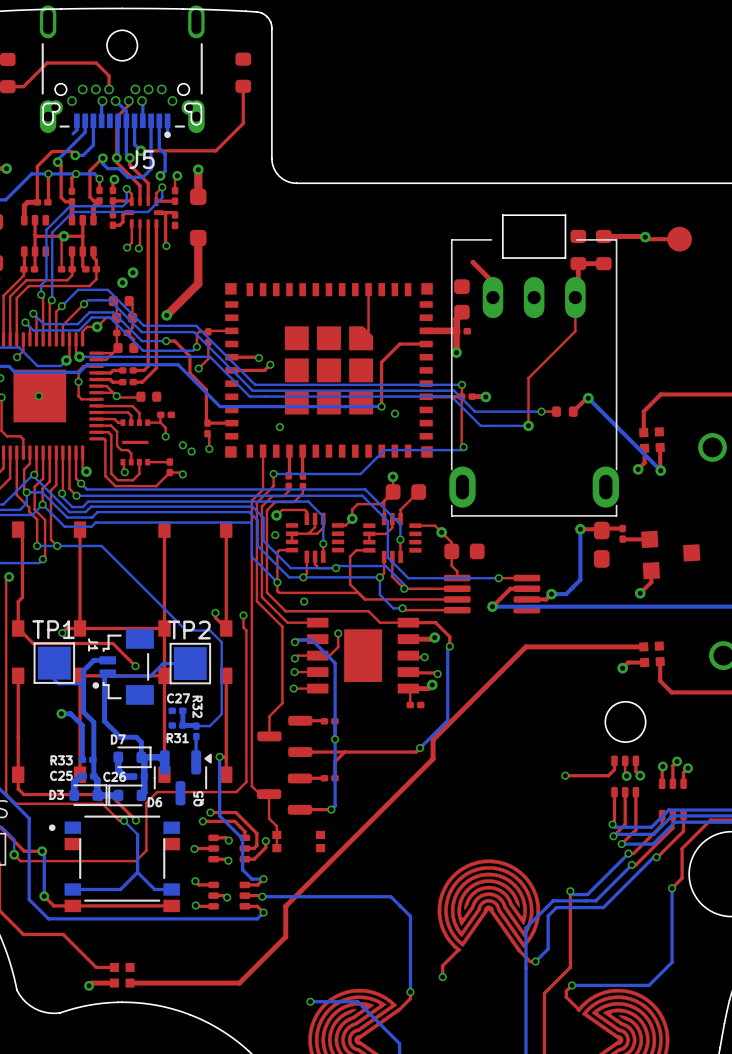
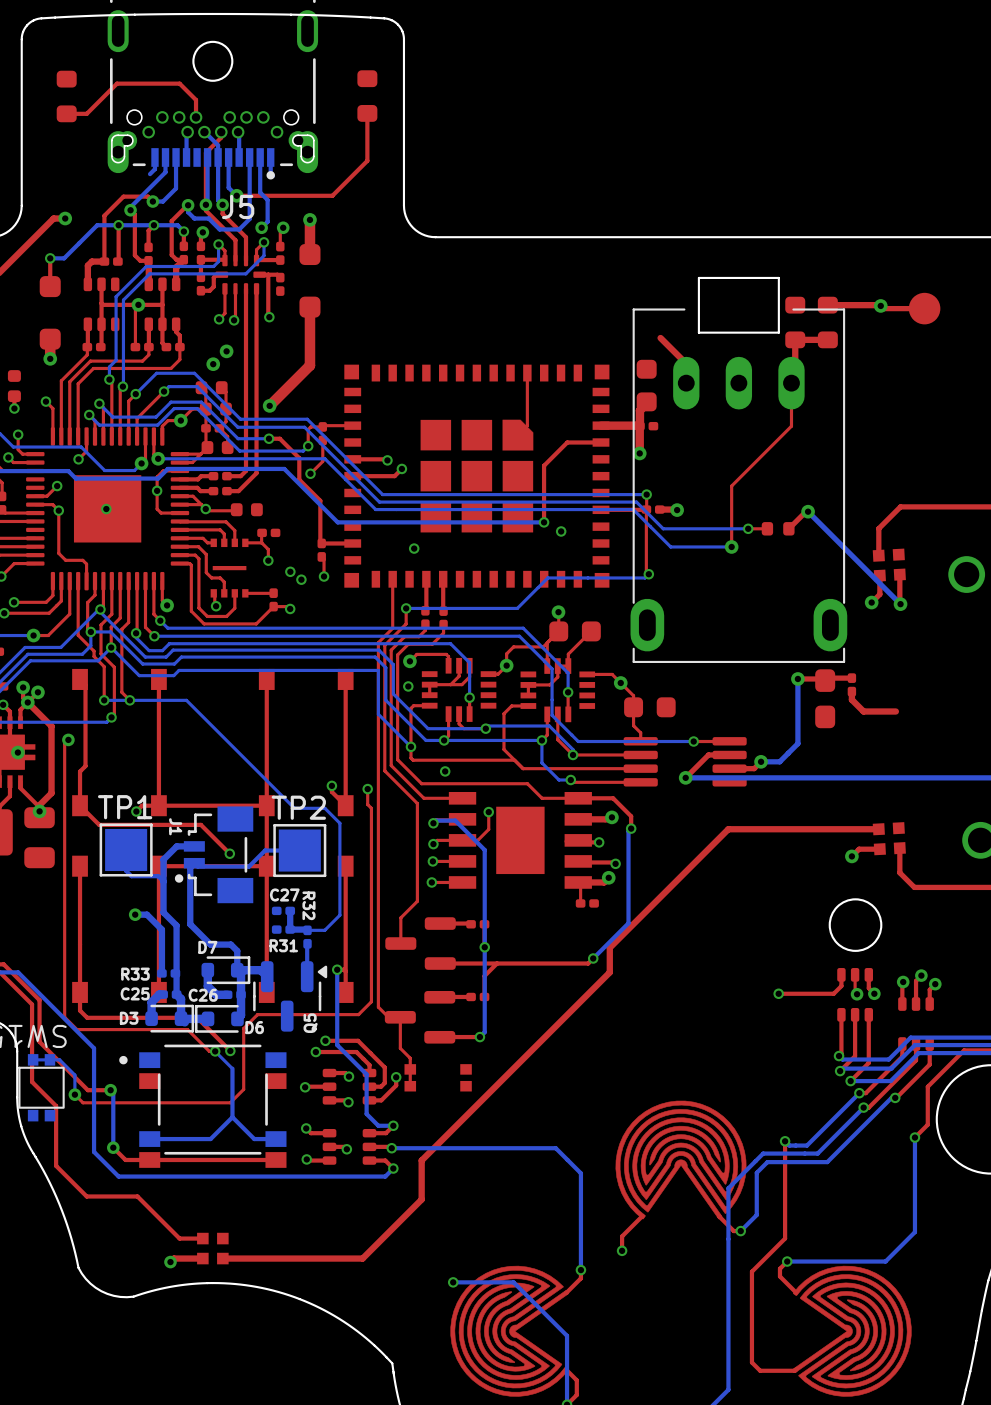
top track: (649, 539) (622, 539) -> (895, 711) (863, 711) (851, 699) (851, 691)
part: (670, 555) -> none
top track: (651, 570) (651, 582) (640, 593) -> none
via: (640, 593) -> none

